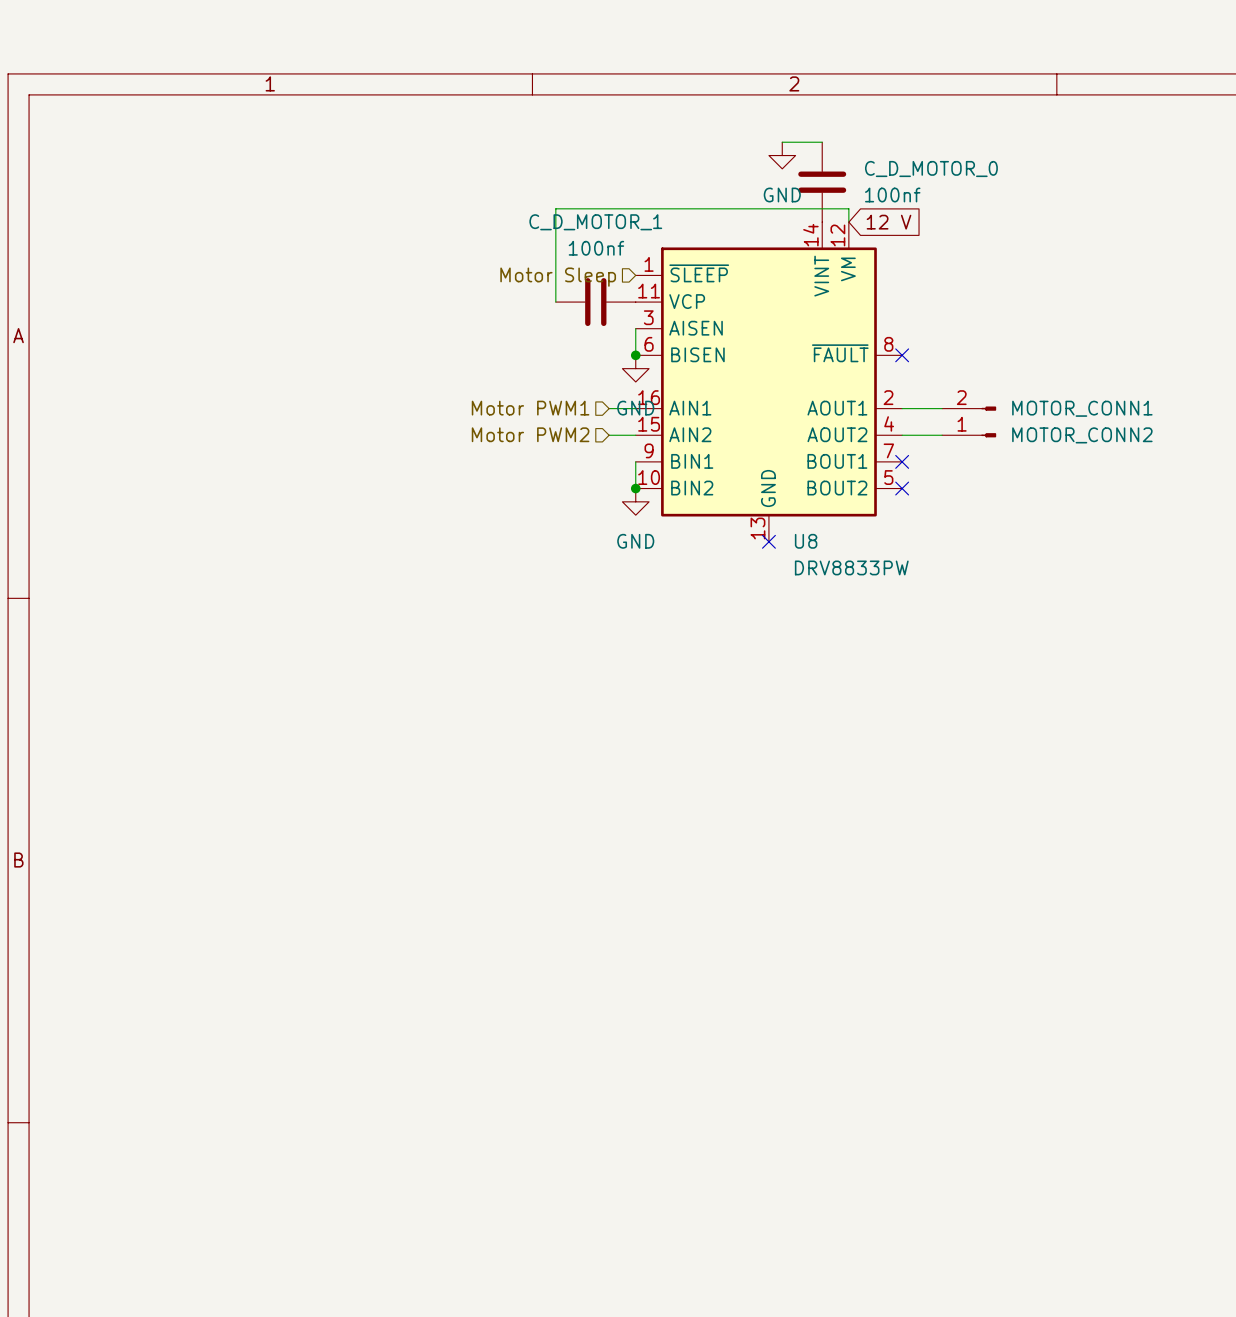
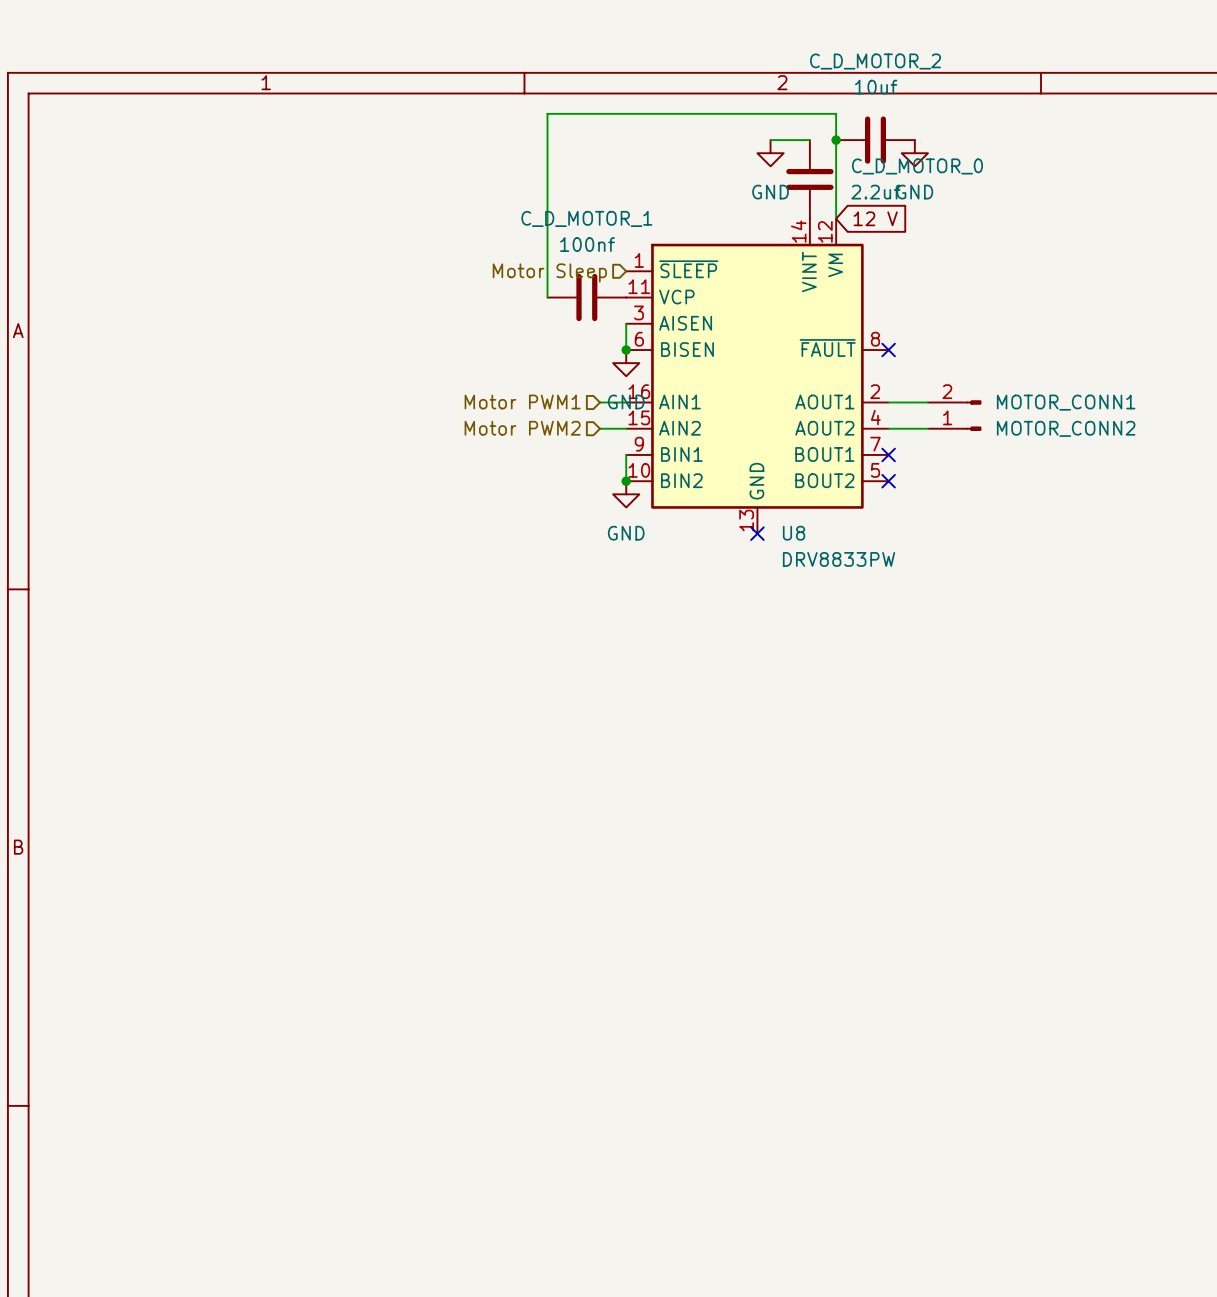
junction: none -> (836, 140)
C_D_MOTOR_2: none -> 10uf (875, 140)
power symbol: none -> GND (914, 153)
C_D_MOTOR_0 value: 100nf (892, 195) -> 2.2uf (875, 192)
wire: (555, 208) (848, 208) -> (547, 205) (547, 113) (836, 113) (836, 205)

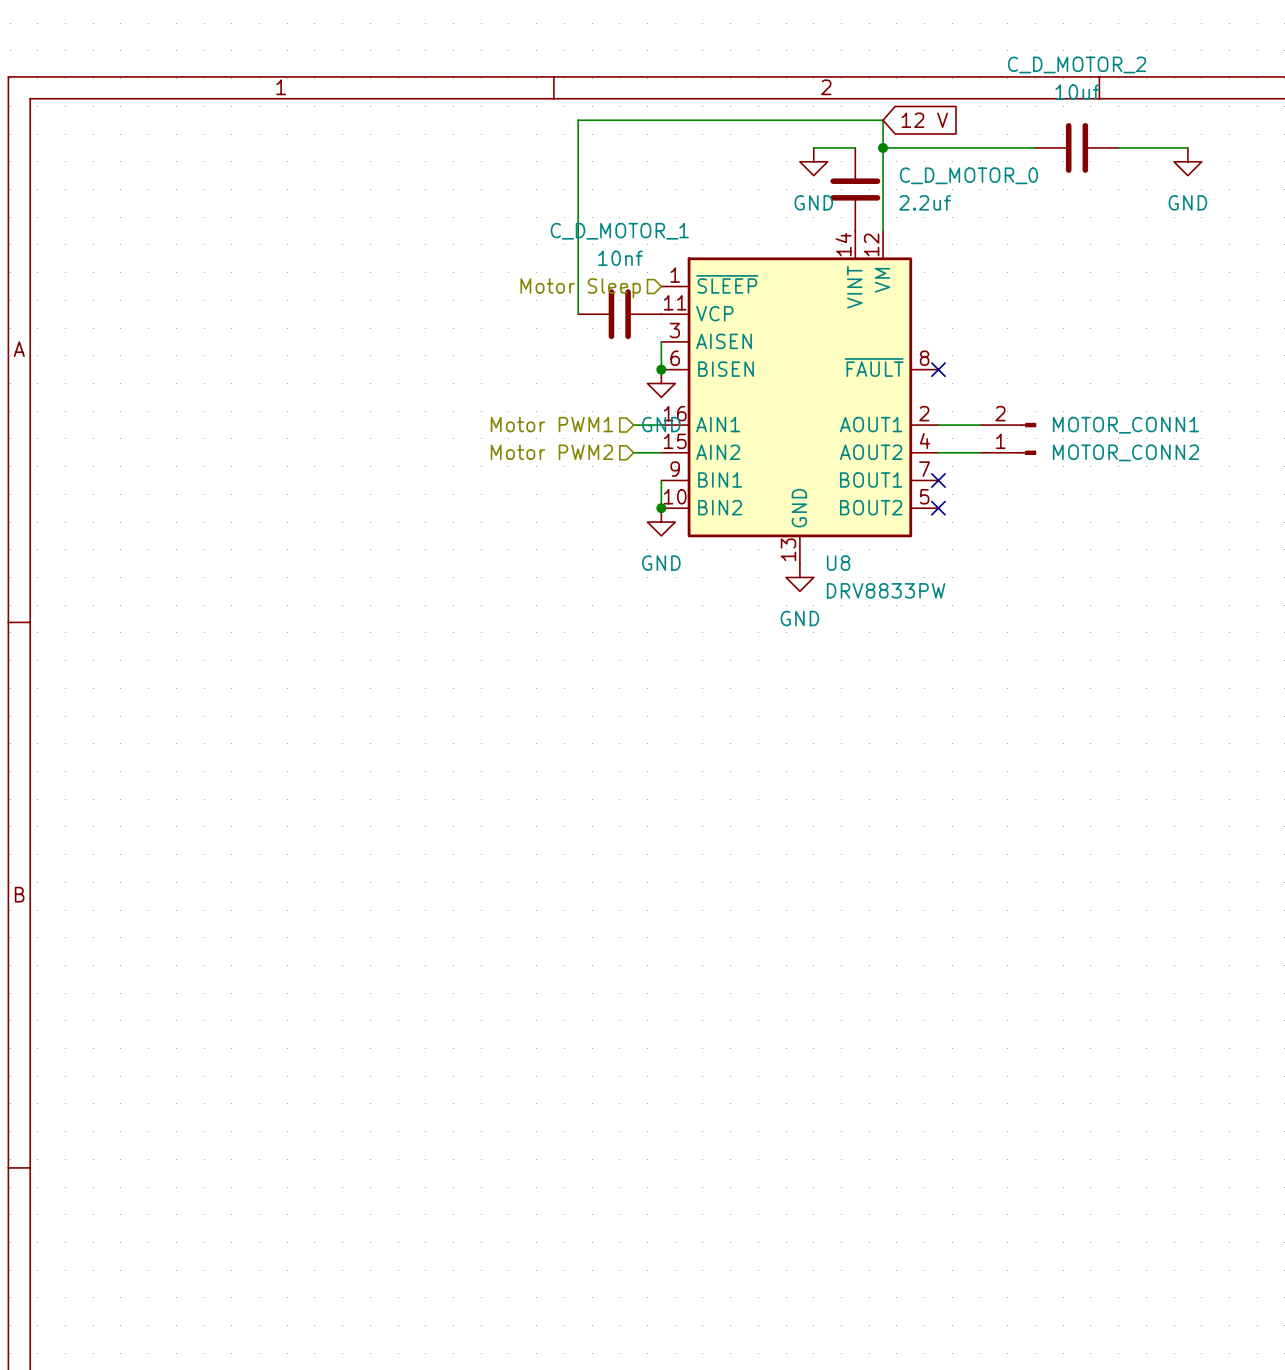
wire: none -> (883, 147) (1035, 147)
C_D_MOTOR_2 position: (875, 140) -> (1077, 147)
wire: none -> (1118, 147) (1187, 147)
power symbol position: GND (914, 153) -> GND (1187, 161)
global label position: 12 V (875, 218) -> 12 V (924, 120)
C_D_MOTOR_1 value: 100nf (587, 244) -> 10nf (620, 258)
no-connect mark: (757, 533) -> none
power symbol: none -> GND (799, 577)

